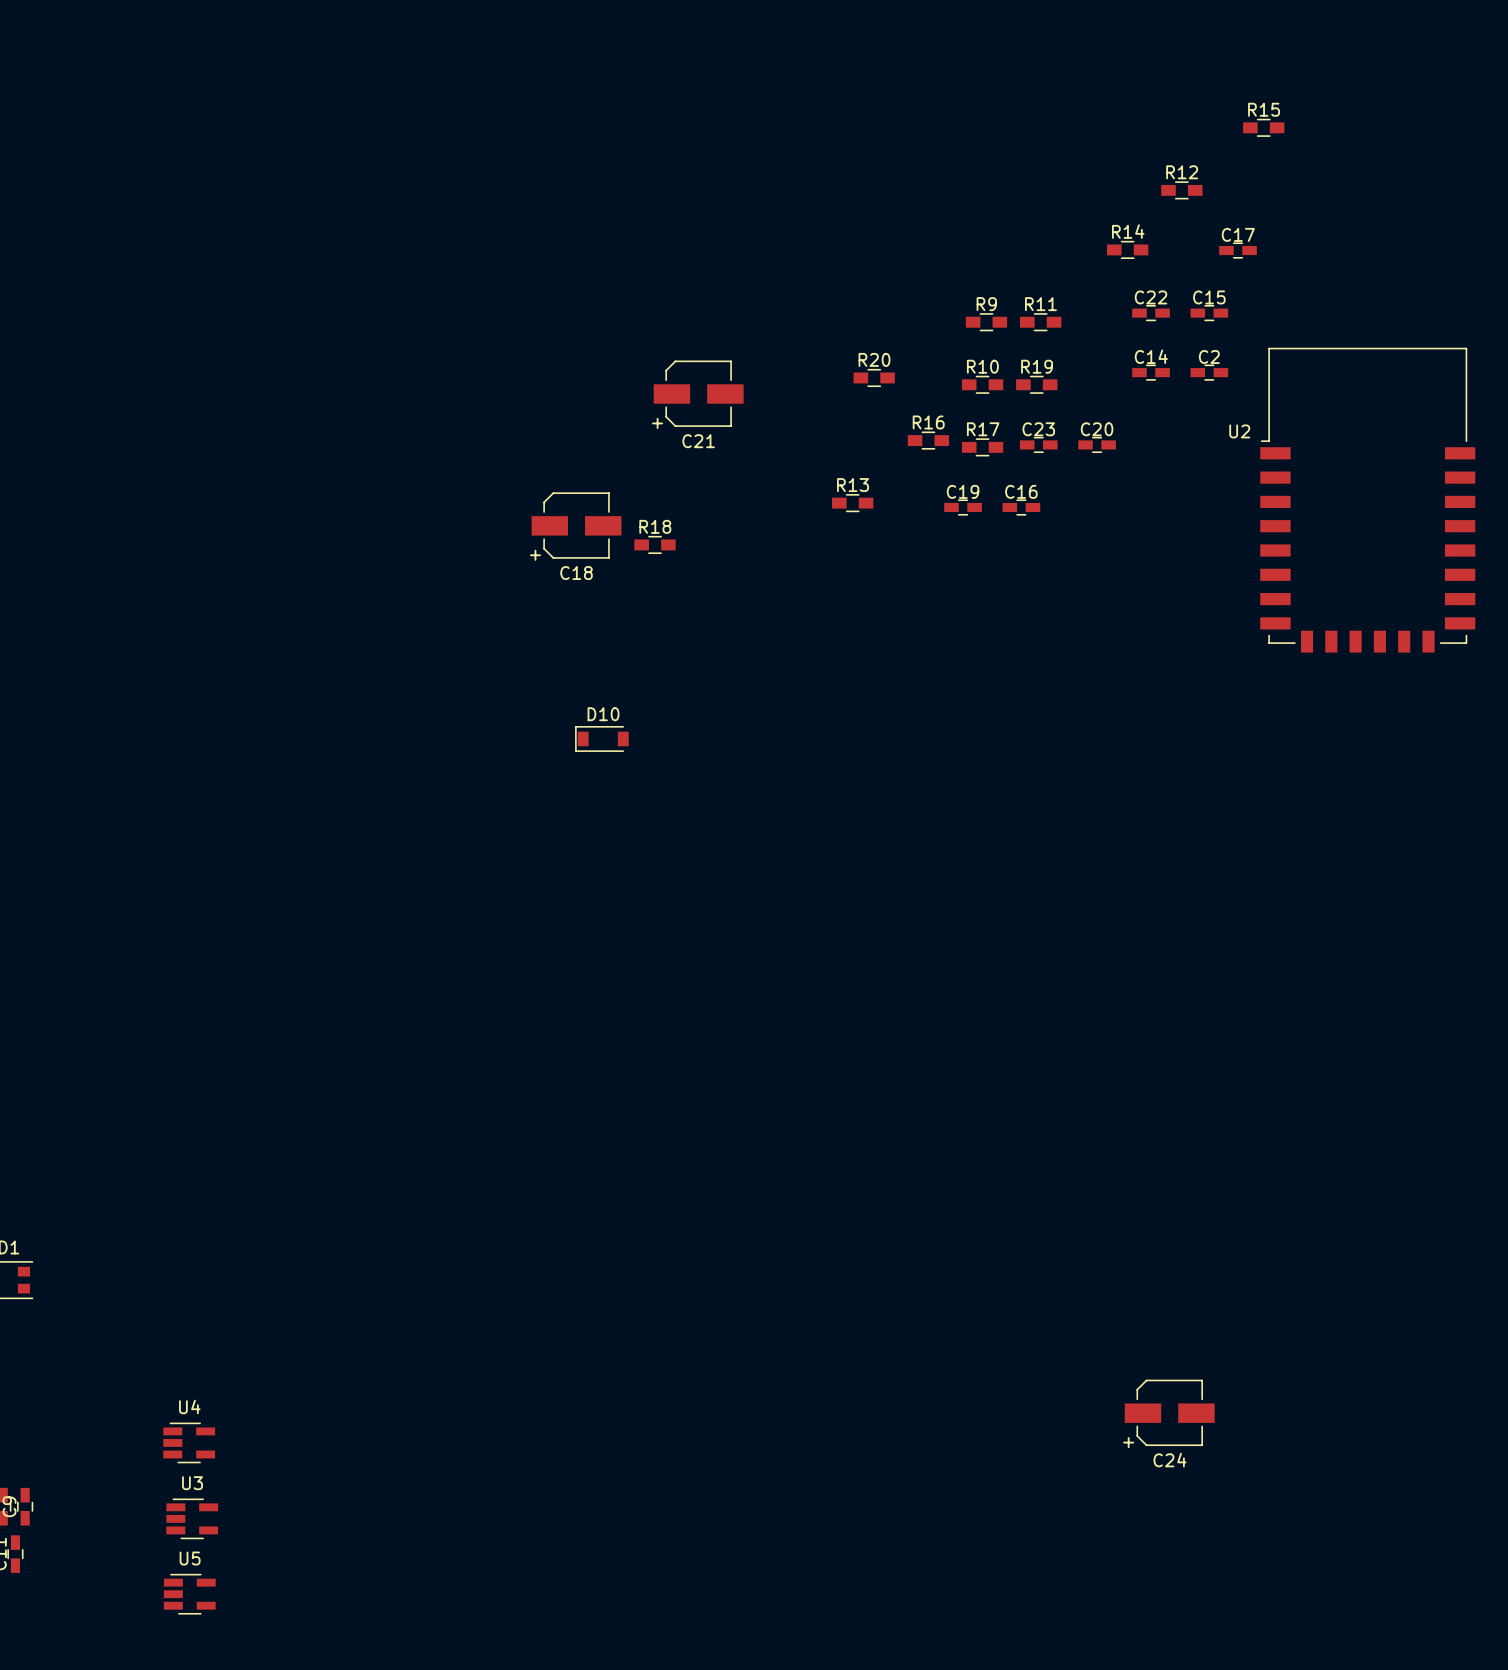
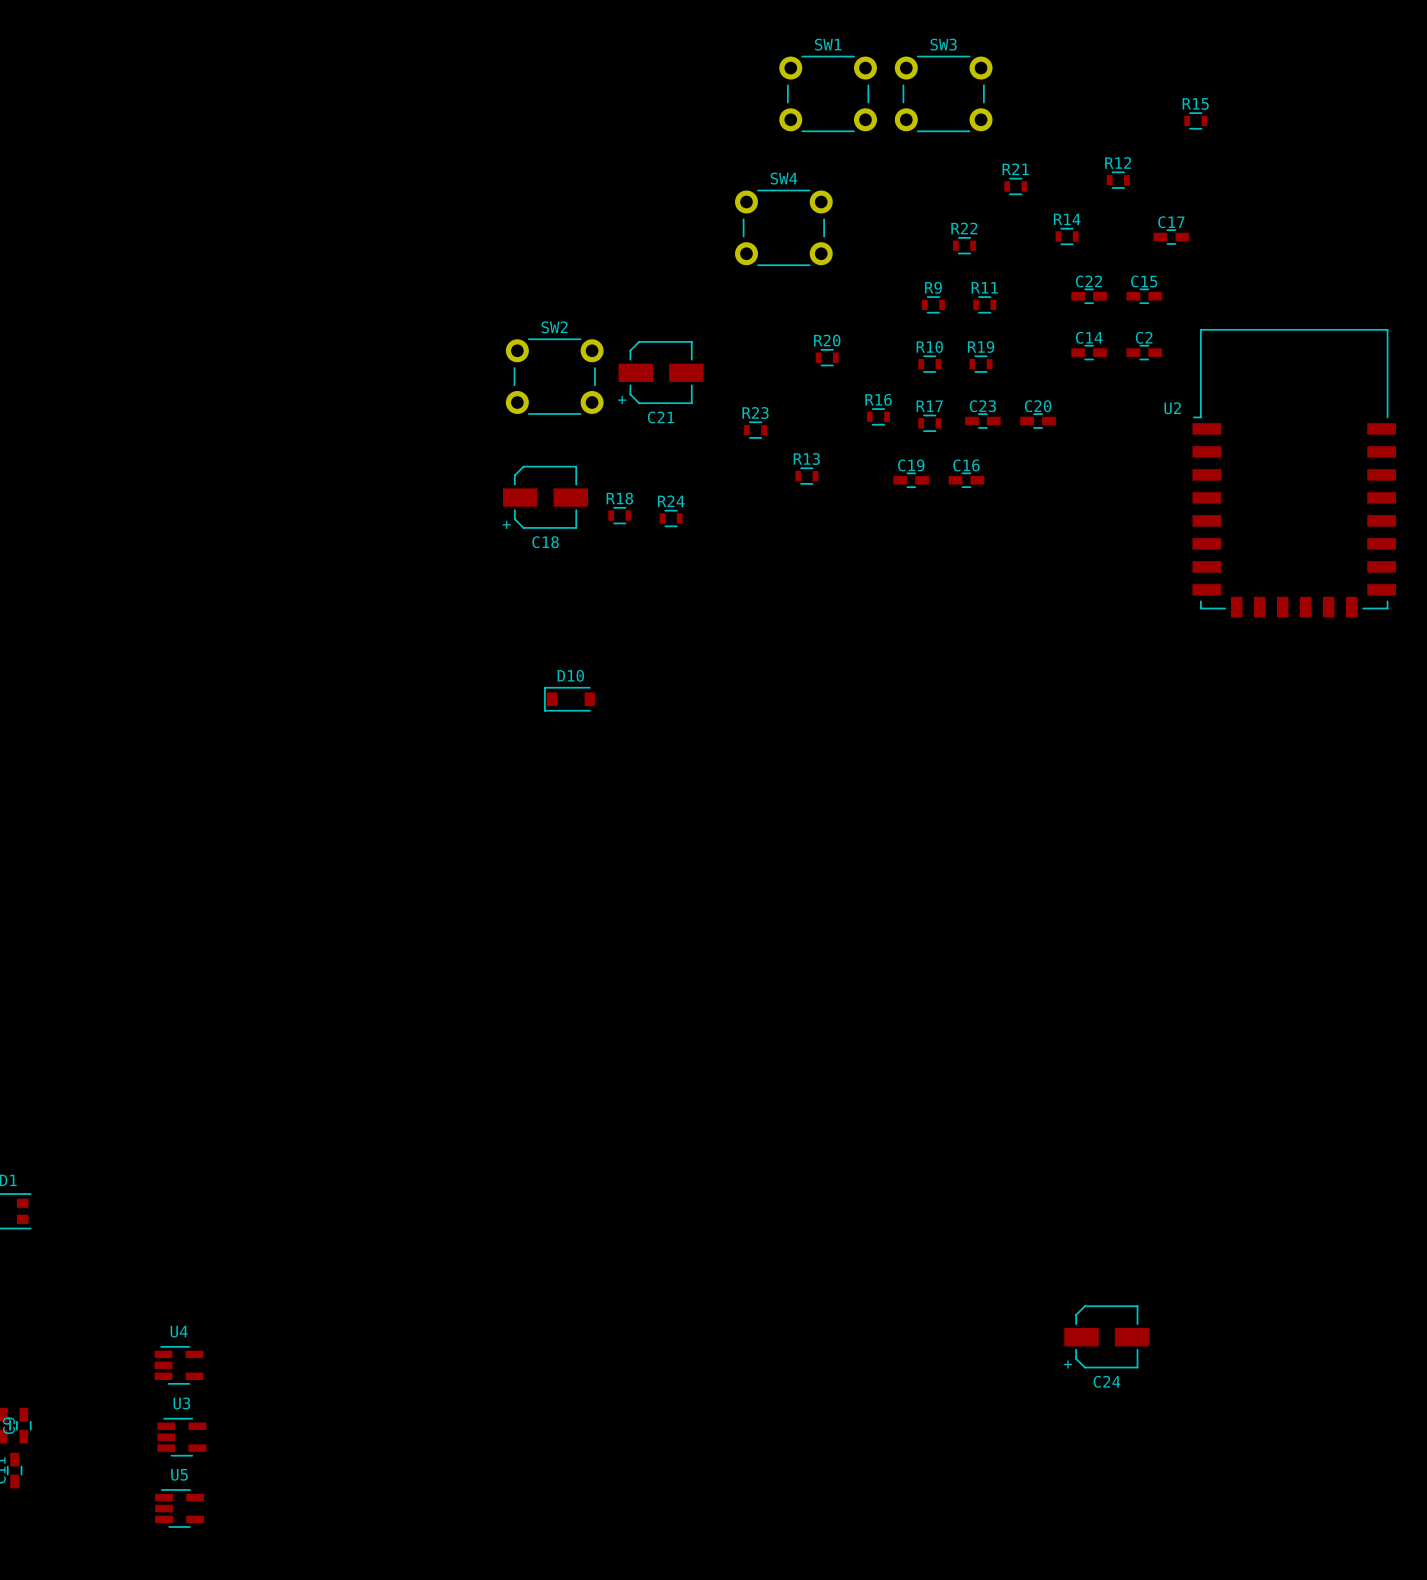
SW1: none -> (828, 93)
SW3: none -> (943, 93)
R15 footprint: [1243, 118, 1285, 137] -> [1184, 112, 1208, 130]
R12 footprint: [1161, 181, 1203, 200] -> [1106, 171, 1130, 189]
R21: none -> (1015, 186)
SW4: none -> (783, 227)
R14 footprint: [1107, 240, 1149, 259] -> [1055, 227, 1079, 245]
R22: none -> (964, 245)
R9 footprint: [965, 313, 1008, 332] -> [921, 296, 945, 314]
R11 footprint: [1020, 313, 1062, 332] -> [973, 296, 997, 314]
R20 footprint: [853, 368, 895, 387] -> [815, 349, 839, 367]
R10 footprint: [961, 375, 1004, 394] -> [918, 355, 942, 373]
R19 footprint: [1016, 375, 1058, 394] -> [969, 355, 993, 373]
SW2: none -> (554, 376)
R16 footprint: [907, 431, 950, 450] -> [866, 408, 890, 426]
R17 footprint: [961, 438, 1004, 457] -> [918, 414, 942, 432]
R23: none -> (755, 430)
R13 footprint: [832, 494, 874, 513] -> [795, 467, 819, 485]
R18 footprint: [634, 535, 676, 554] -> [608, 507, 632, 525]
R24: none -> (671, 518)

